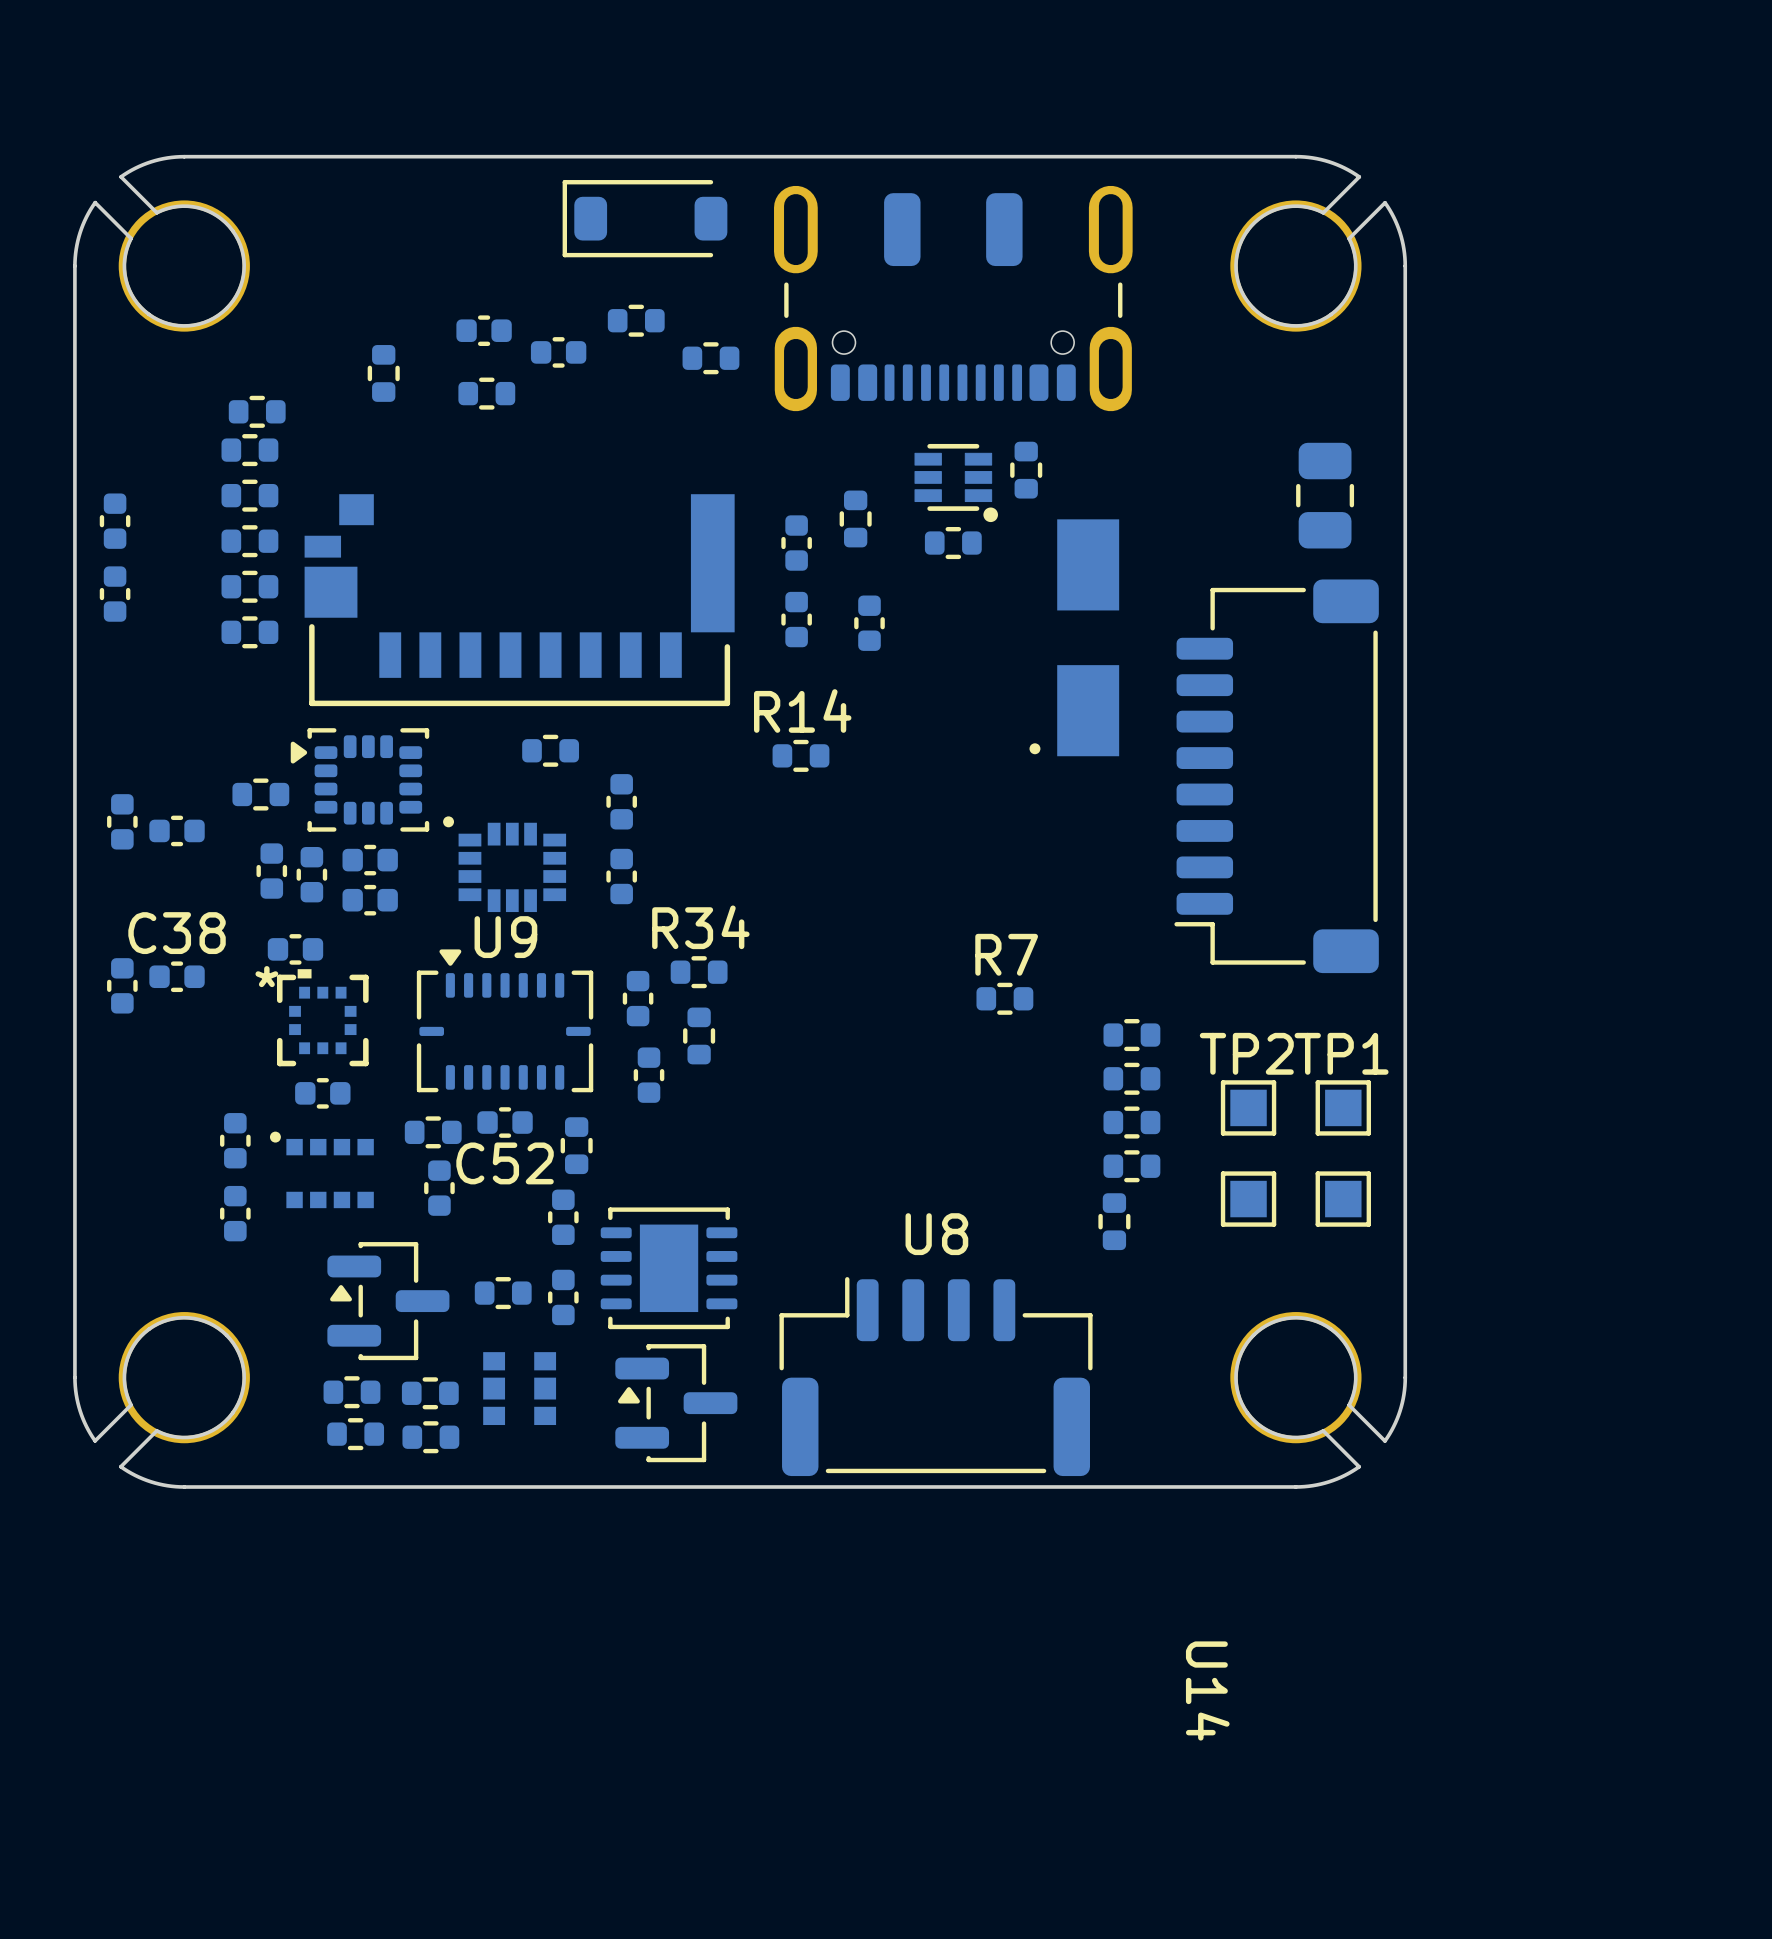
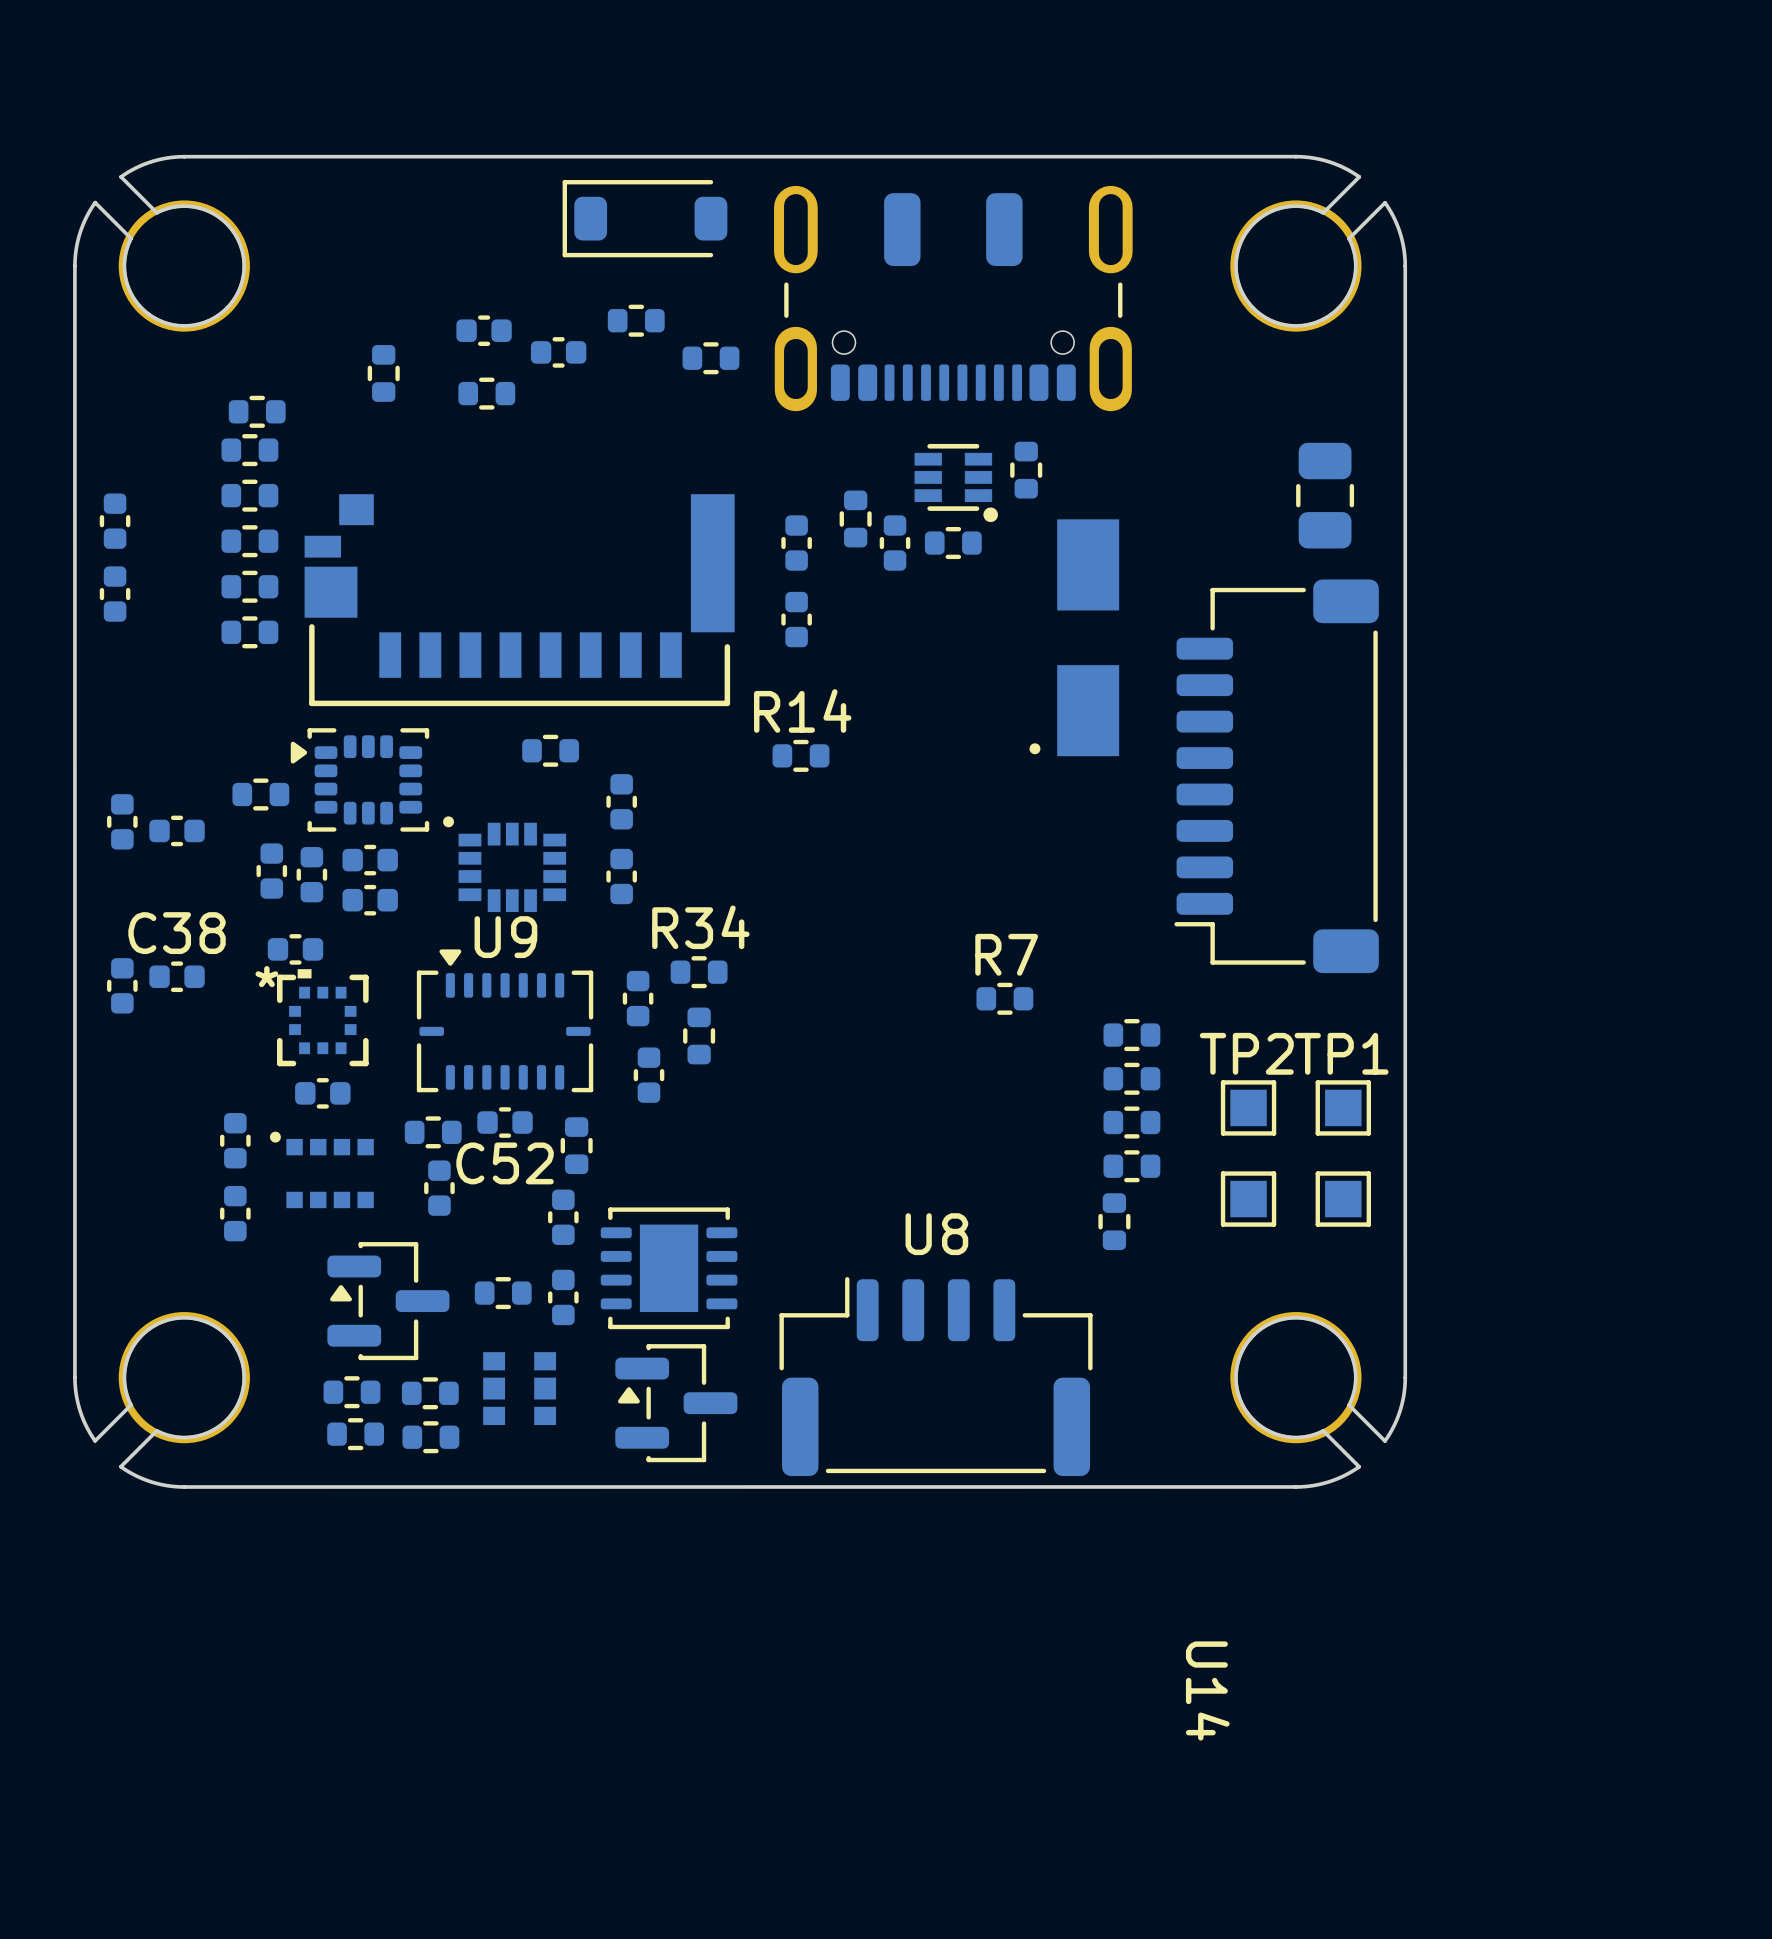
part position: (869, 623) -> (895, 543)

